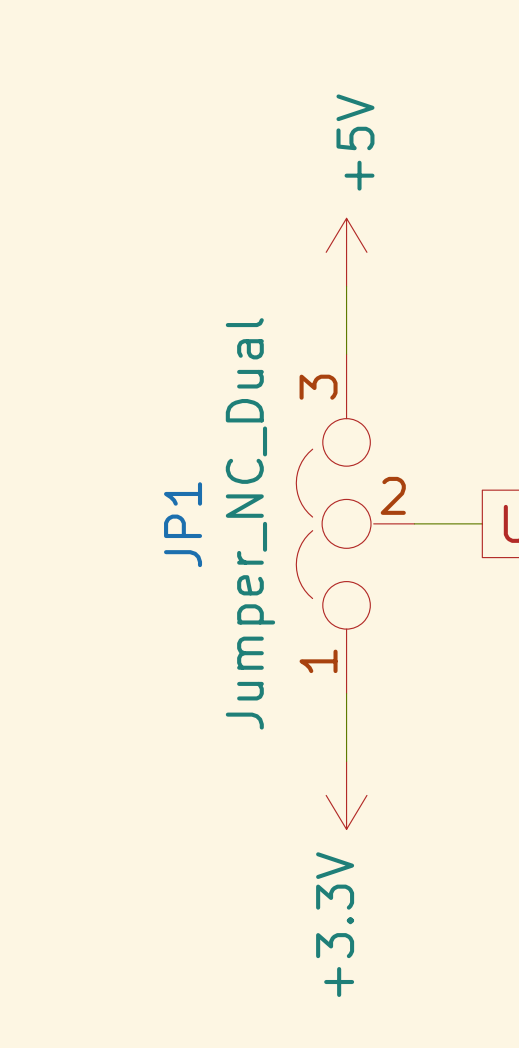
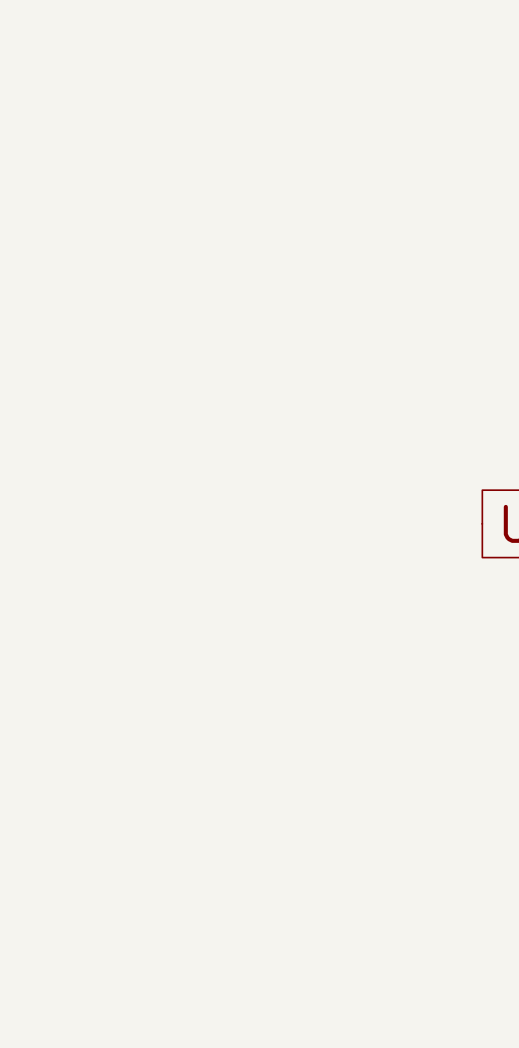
power symbol: +5V (346, 252) -> none
wire: (346, 286) (346, 354) -> none
JP1: Jumper_NC_Dual (355, 523) -> none
wire: (414, 523) (482, 523) -> none
wire: (346, 693) (346, 761) -> none
power symbol: +3.3V (346, 795) -> none

